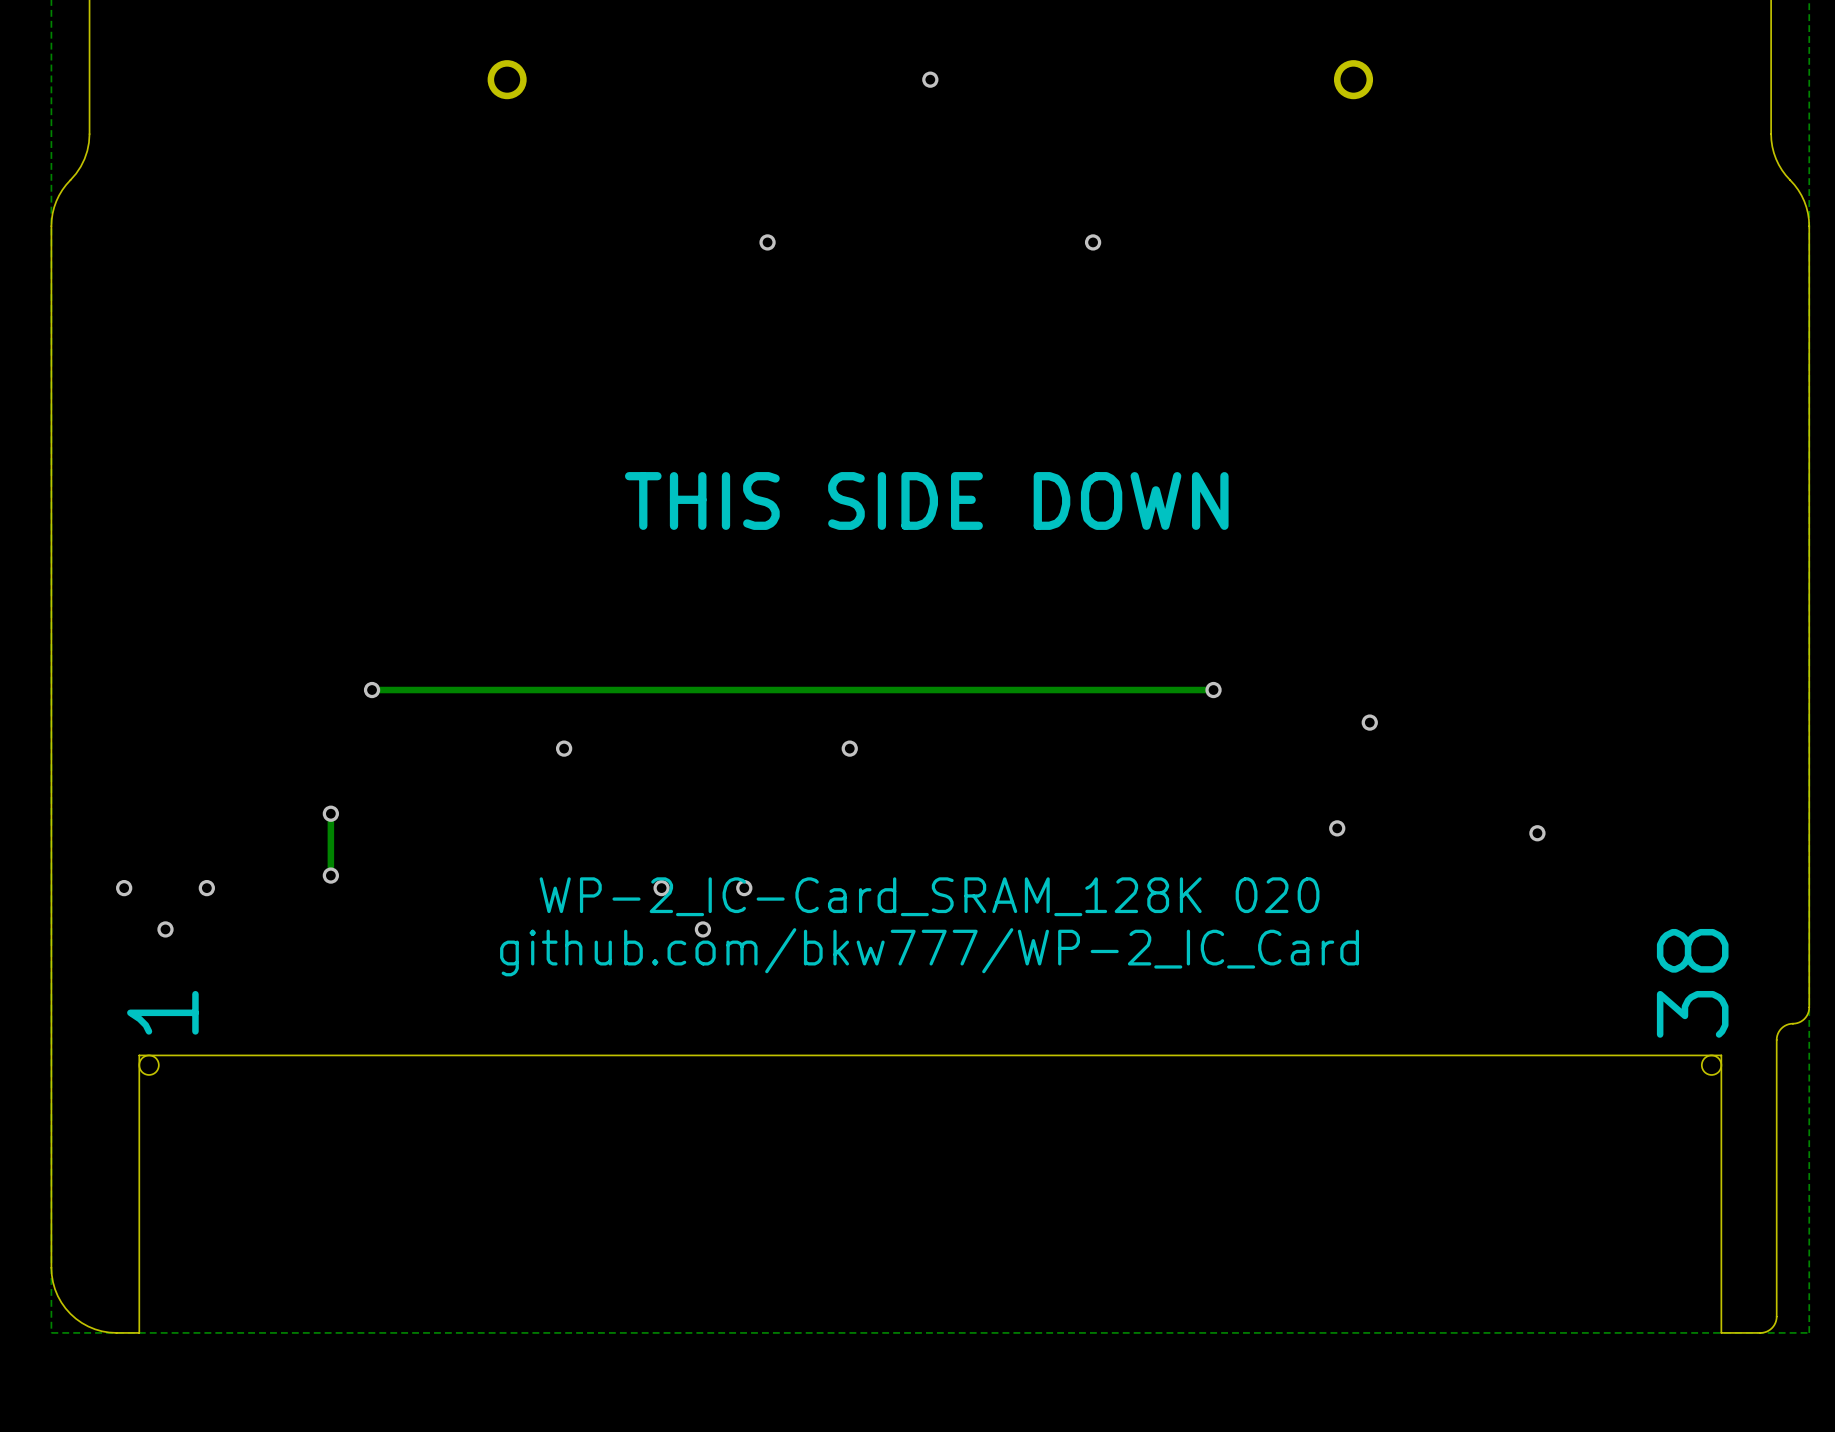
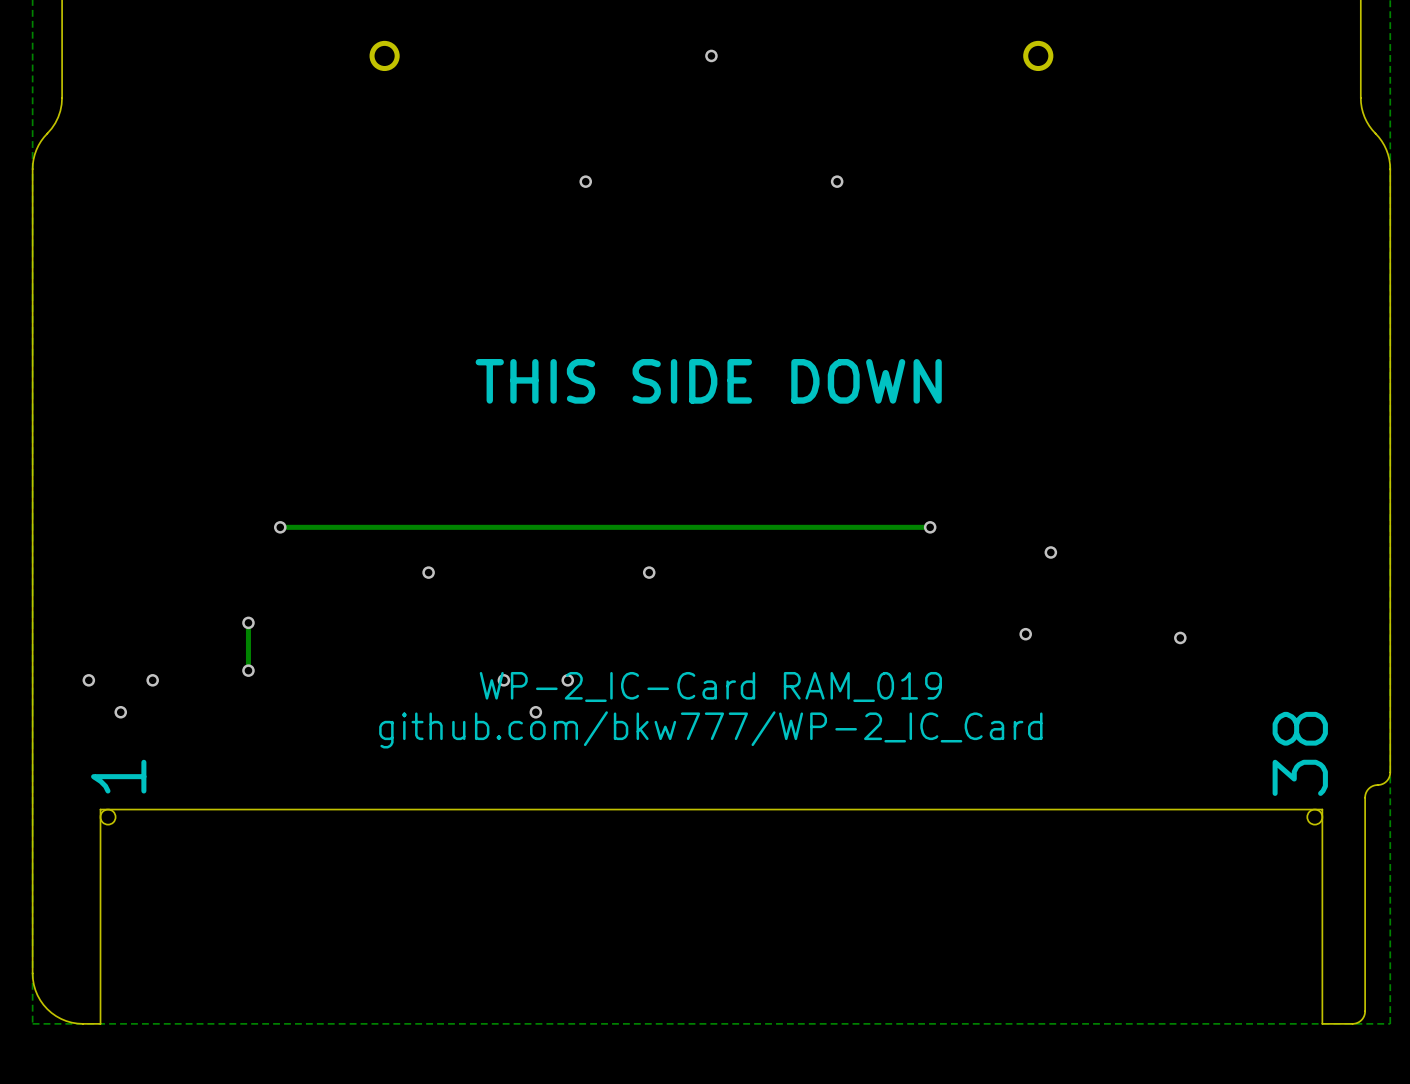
text: WP-2_IC-Card_SRAM_128K 020 (929, 896) -> WP-2_IC-Card RAM_019 (710, 686)

